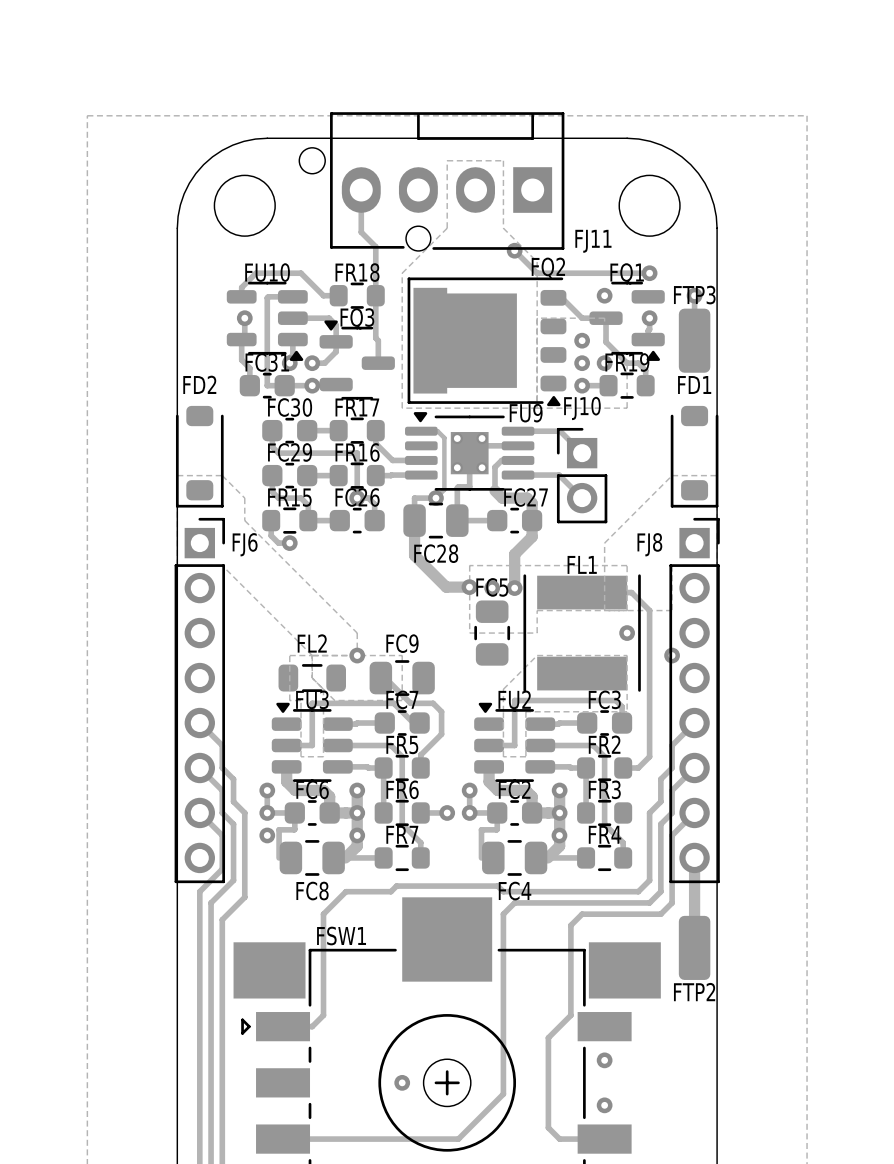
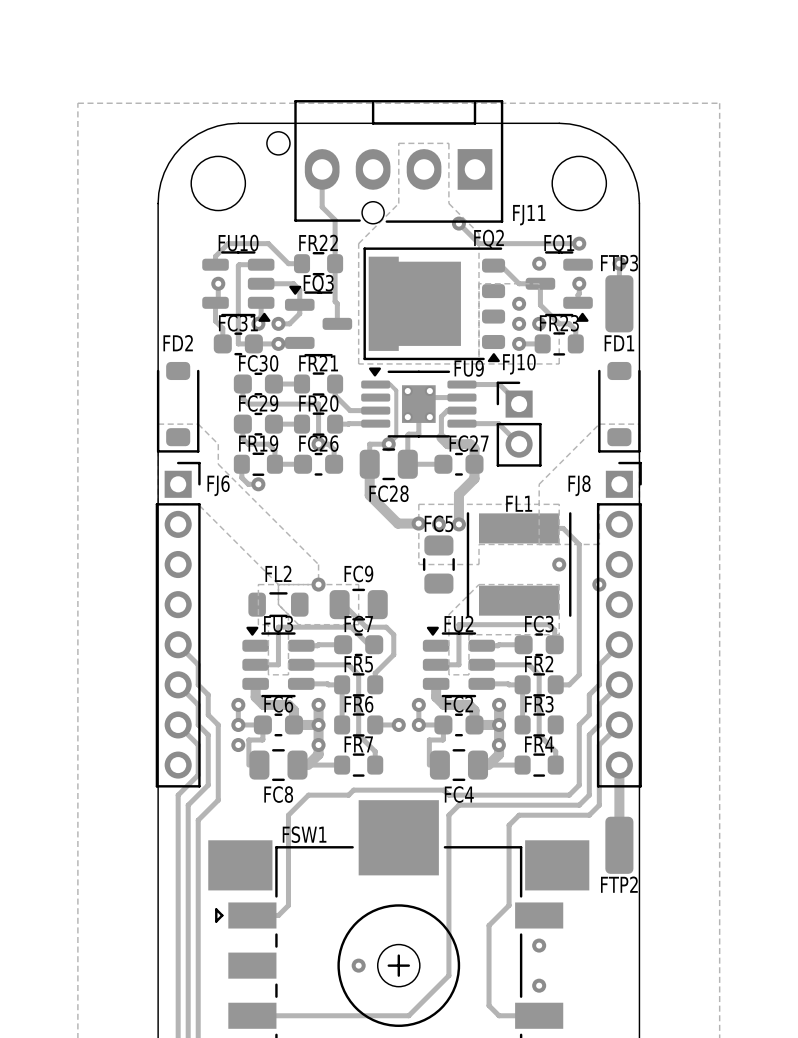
FR18 name: FR18 (357, 272) -> FR22 (318, 242)
FR19 name: FR19 (627, 362) -> FR23 (559, 323)
FR17 name: FR17 (357, 407) -> FR21 (318, 363)
FR16 name: FR16 (357, 452) -> FR20 (318, 403)
FR15 name: FR15 (289, 497) -> FR19 (258, 443)

